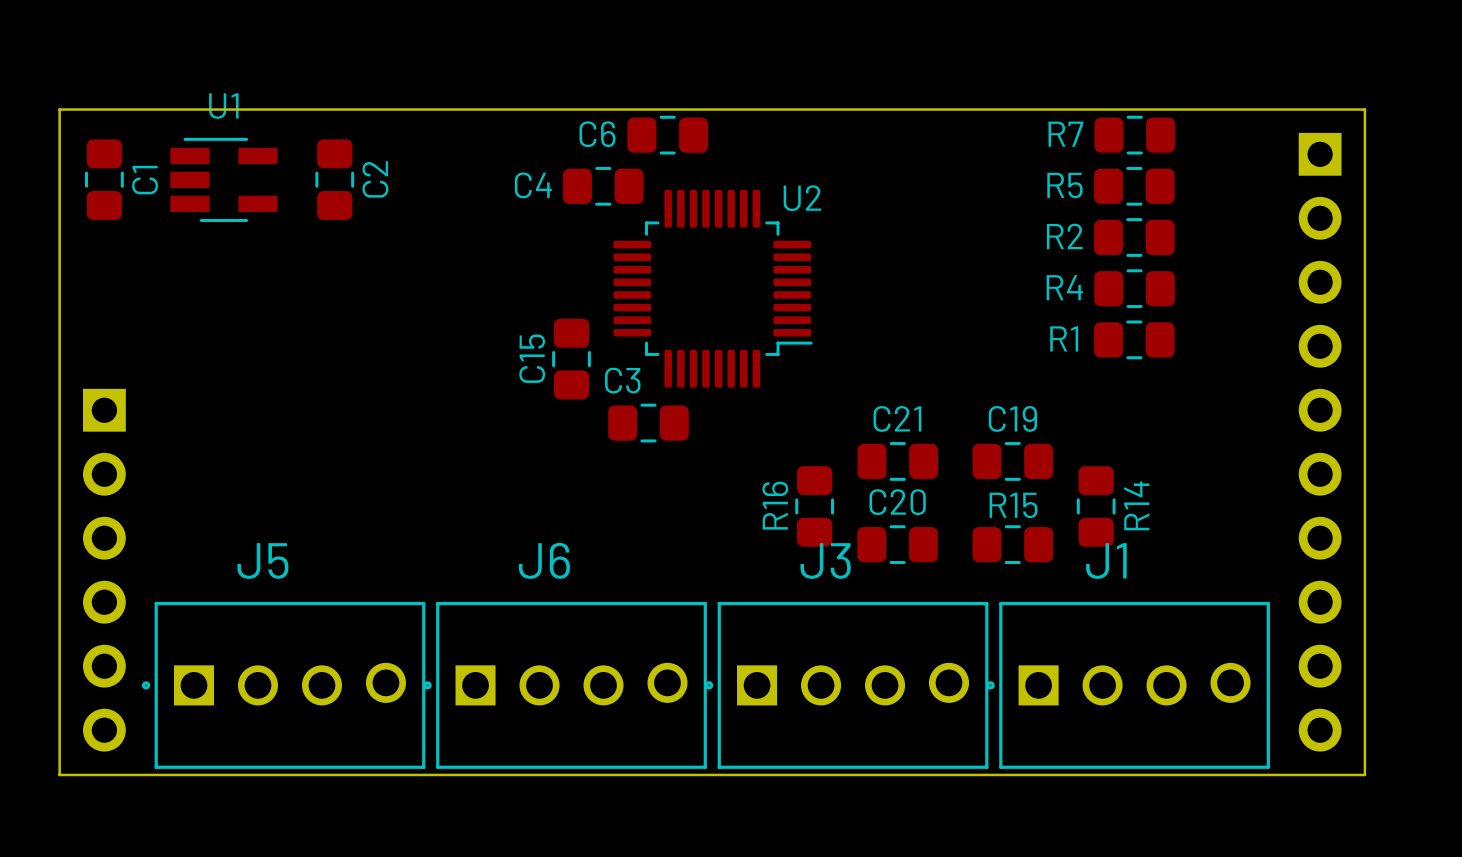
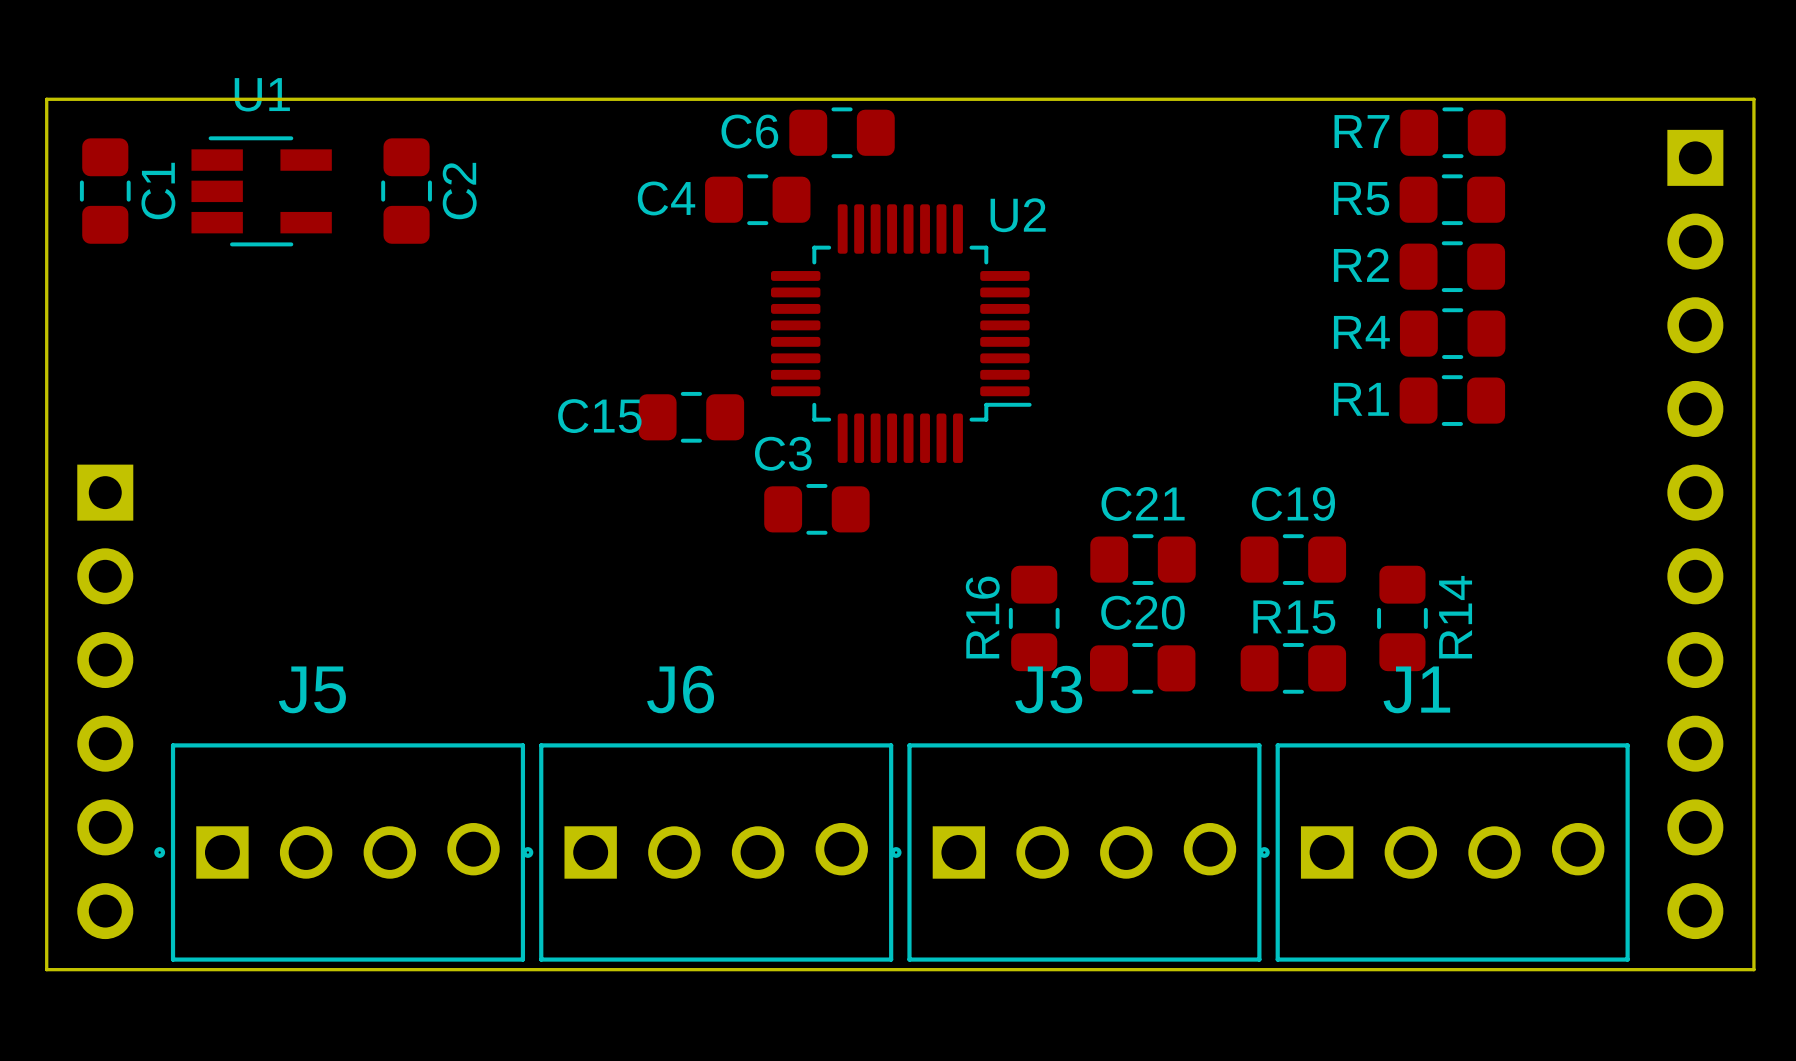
C15 rotation: 0° (571, 359) -> 90° clockwise (691, 417)

